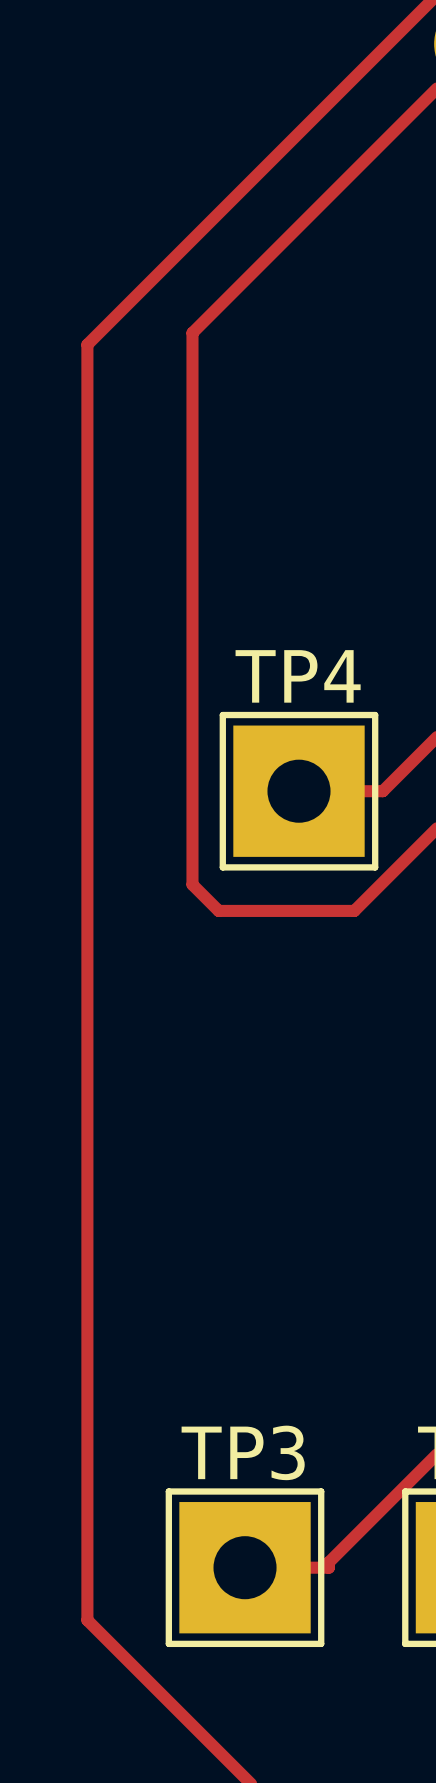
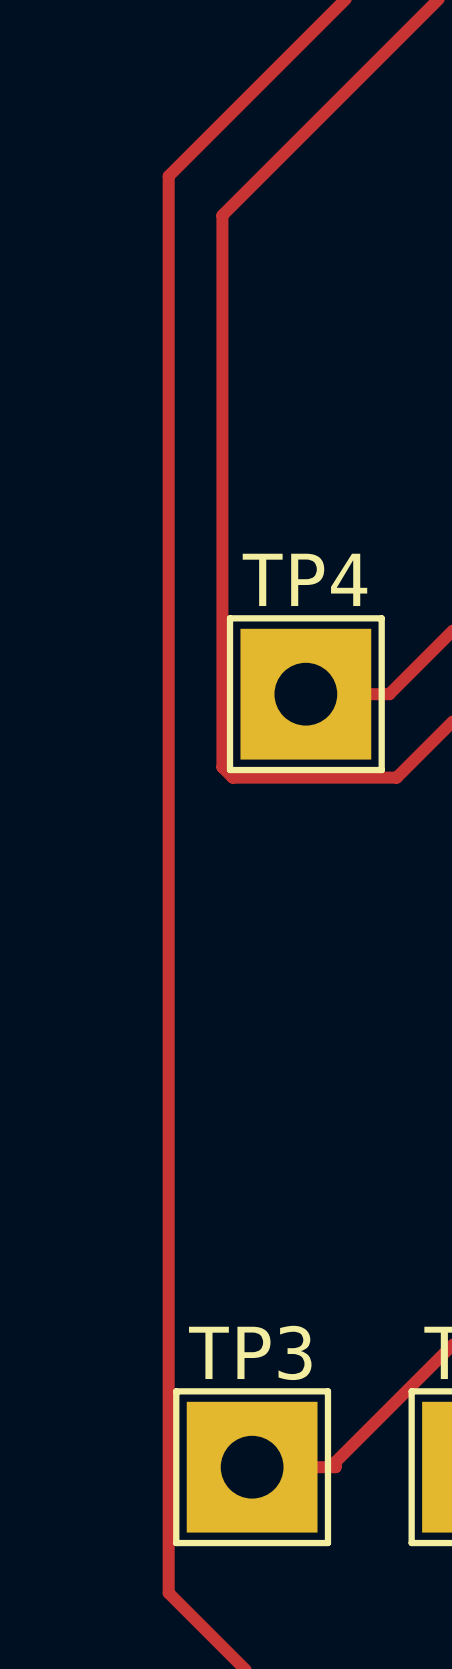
top track: (161, 270) (87, 344) (87, 1620) (161, 1694) -> (168, 176) (168, 1592)
top track: (215, 310) (192, 332) (192, 884) (218, 910) (354, 910) (390, 875) -> (222, 215) (222, 767) (232, 777) (396, 777)

